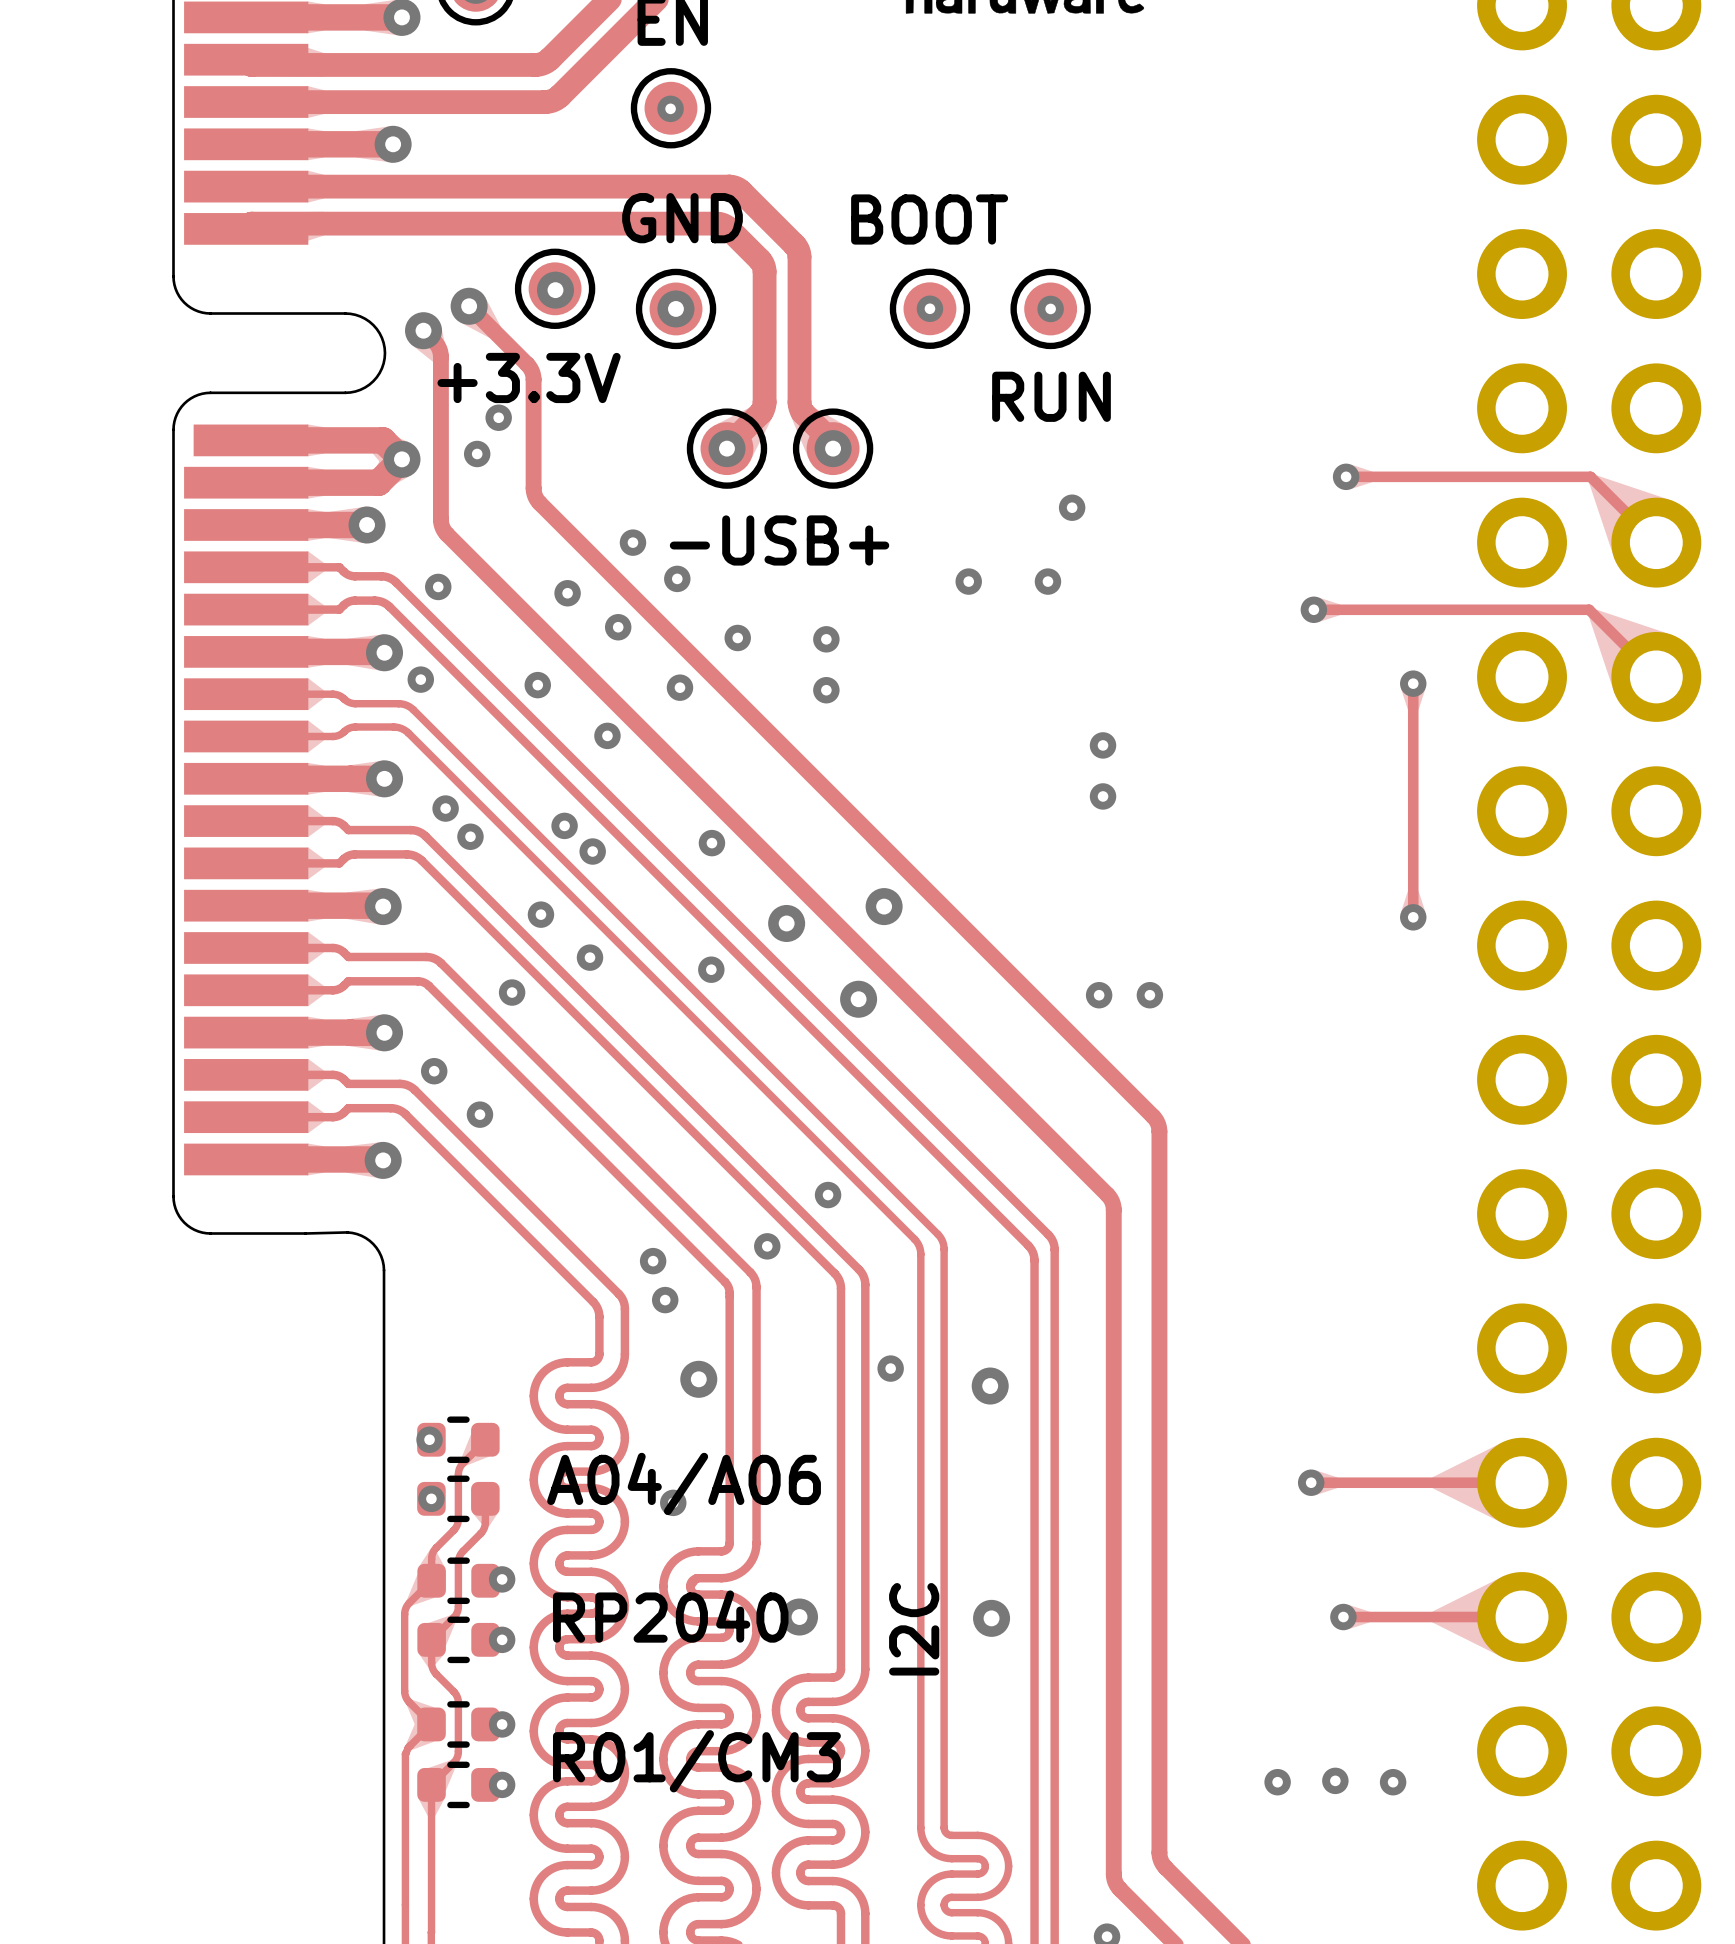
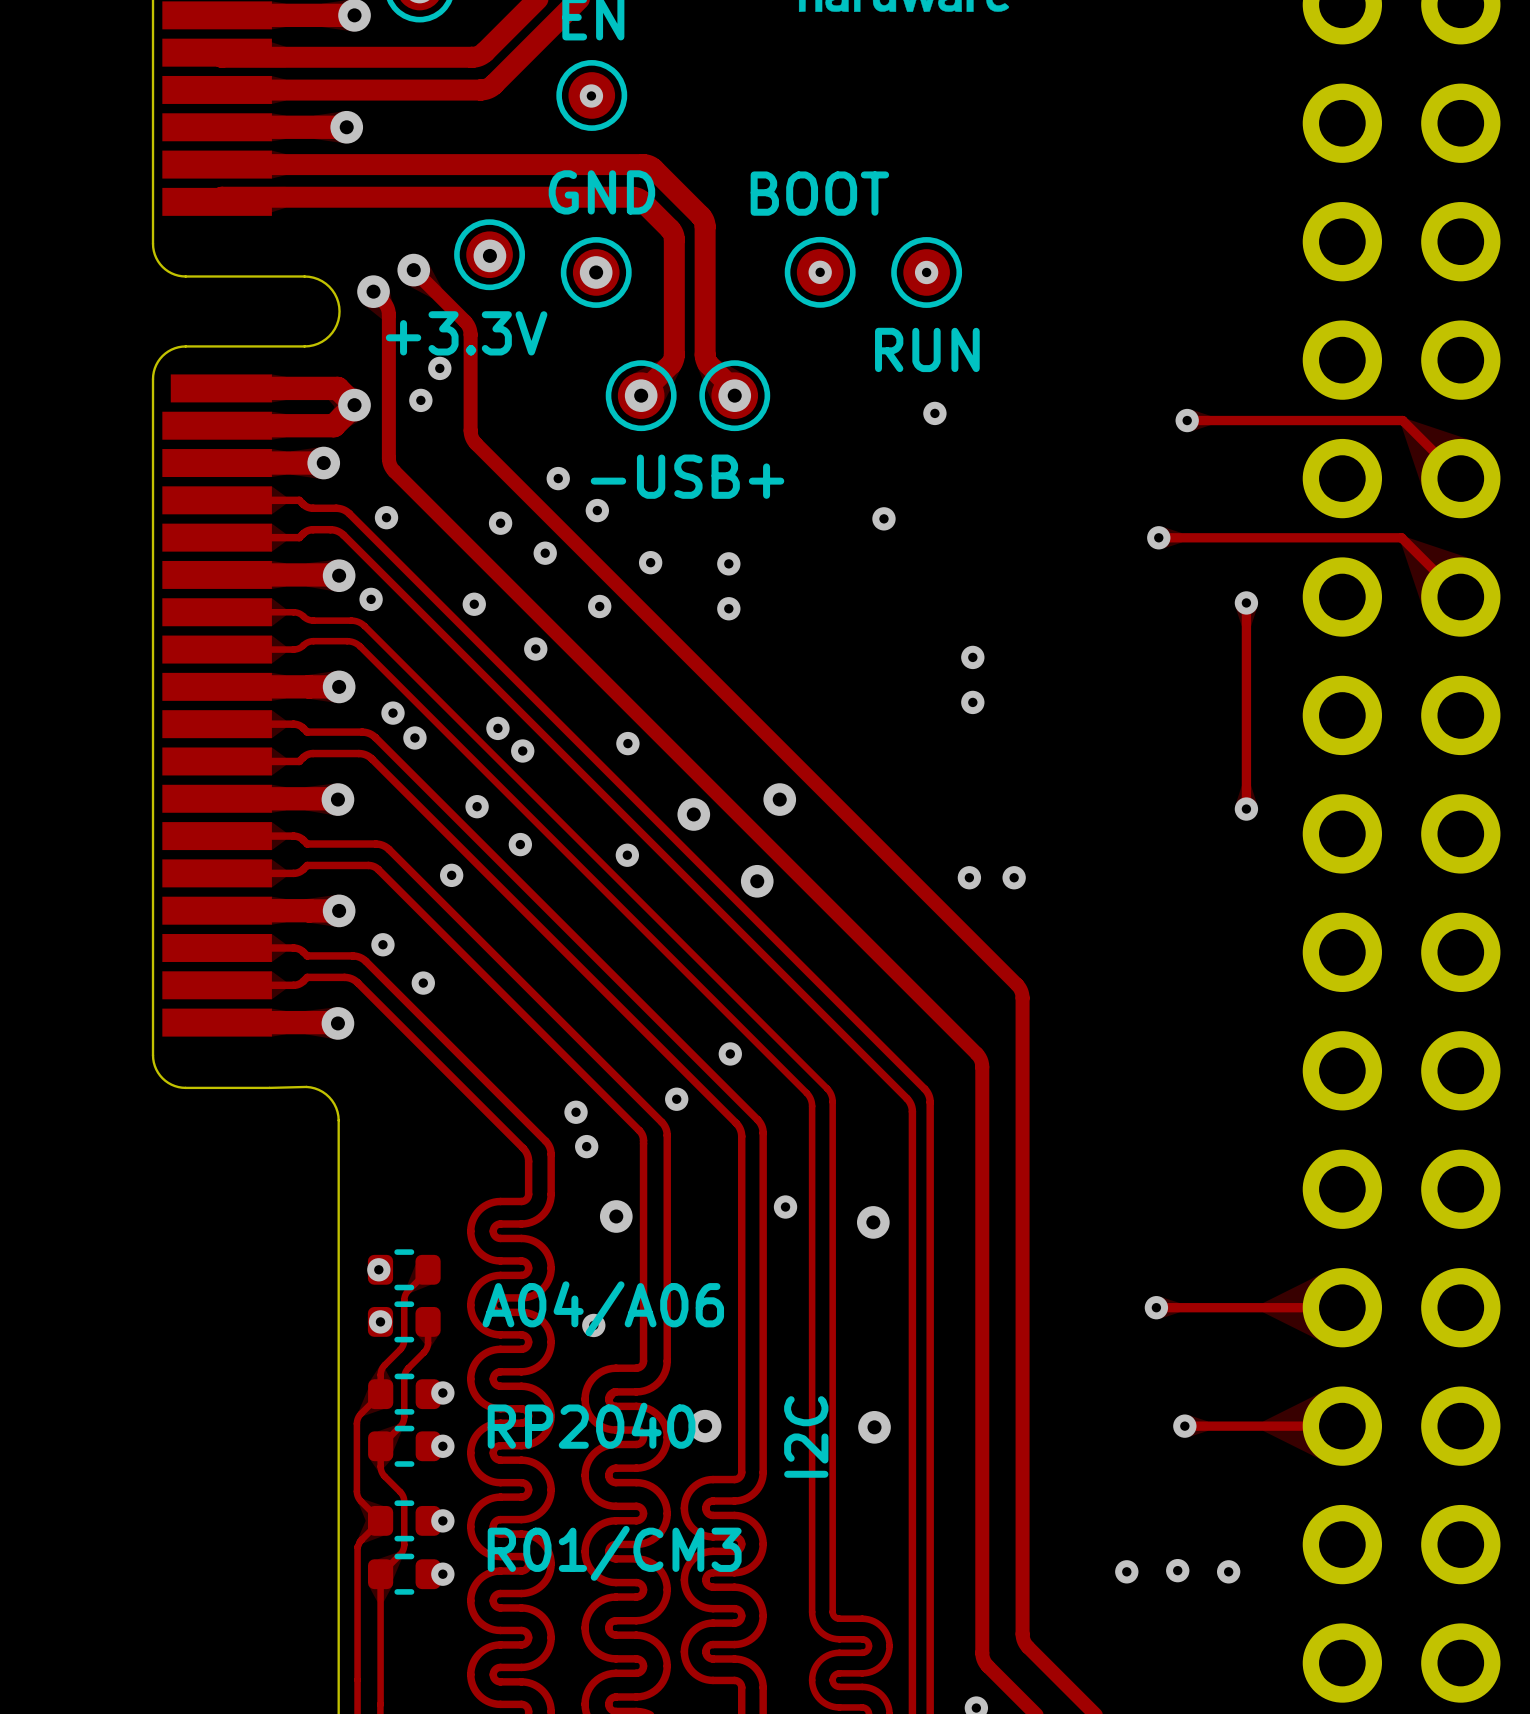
via position: (1072, 507) -> (934, 413)
via: (968, 581) -> none
via: (1047, 581) -> none
via: none -> (883, 518)

